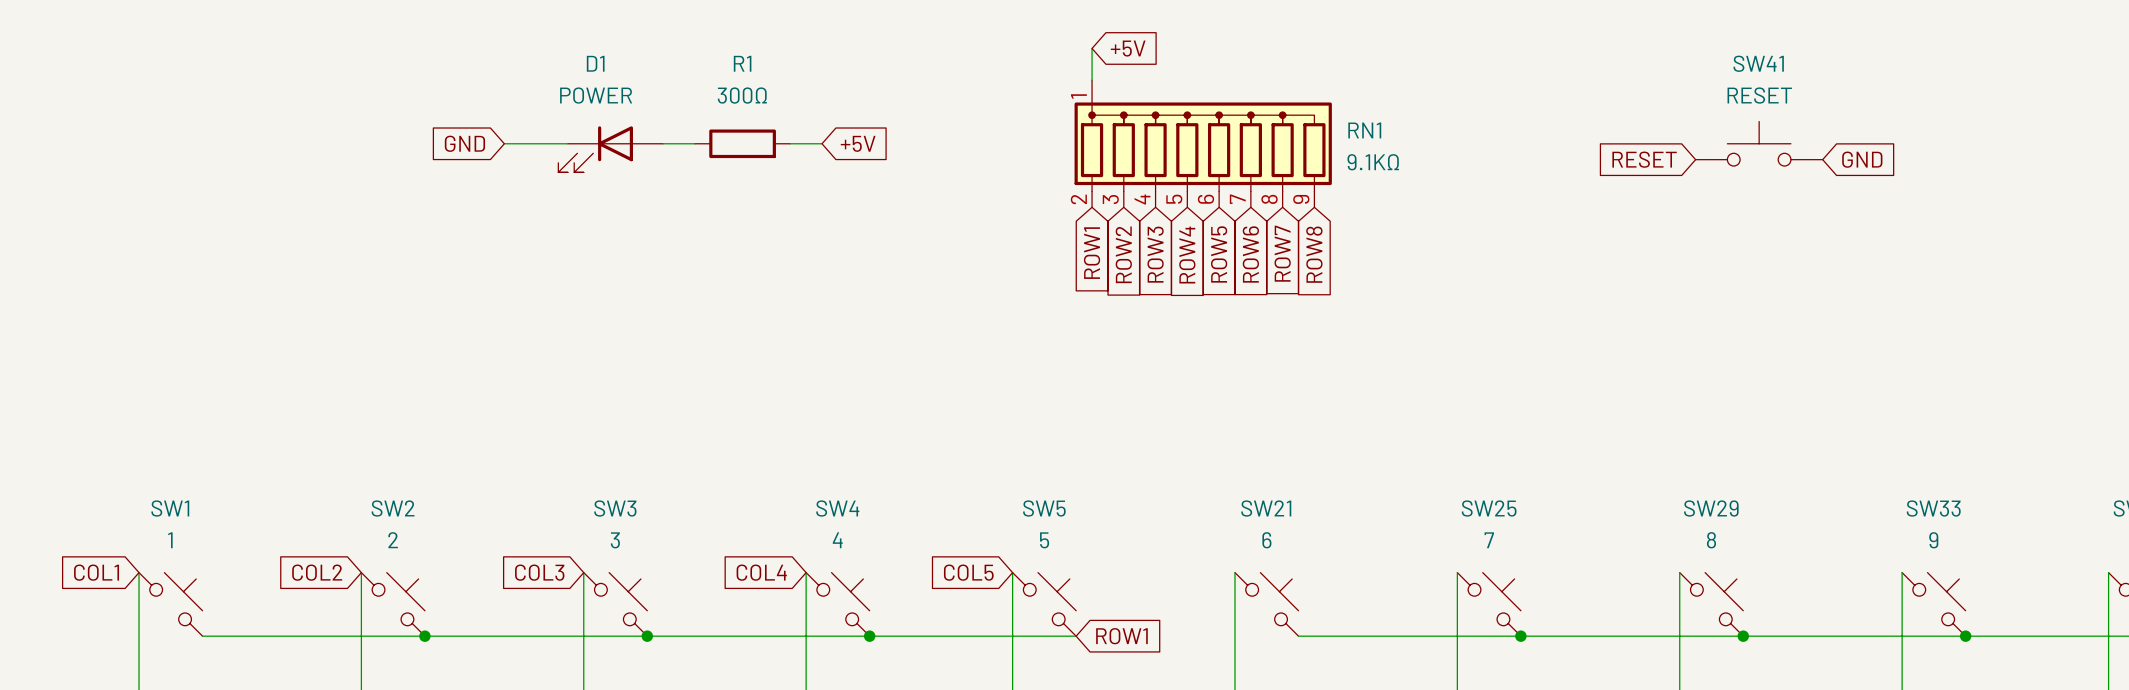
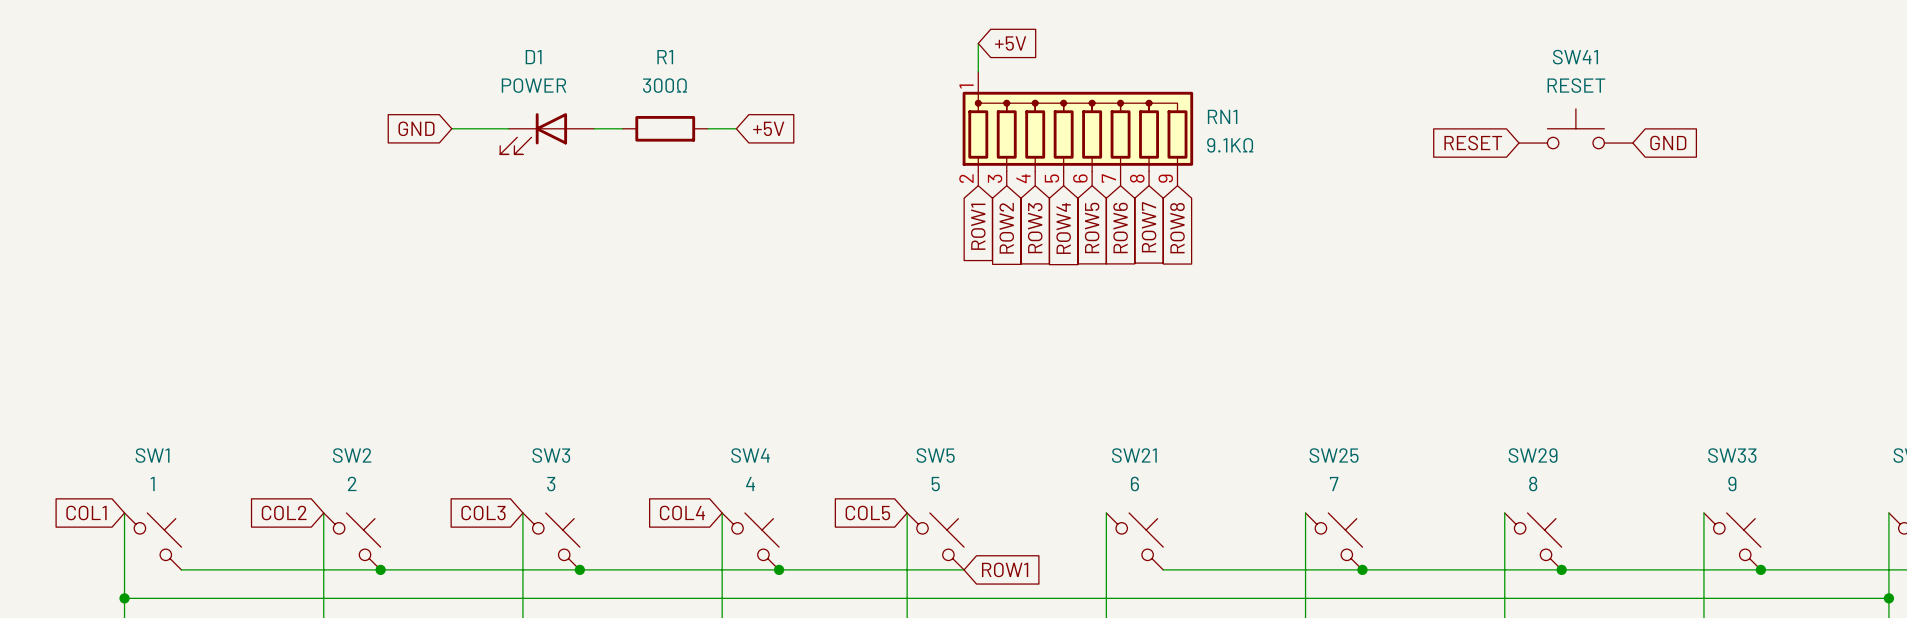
wire: none -> (124, 598) (1888, 598)
junction: none -> (124, 598)
junction: none -> (1888, 598)

